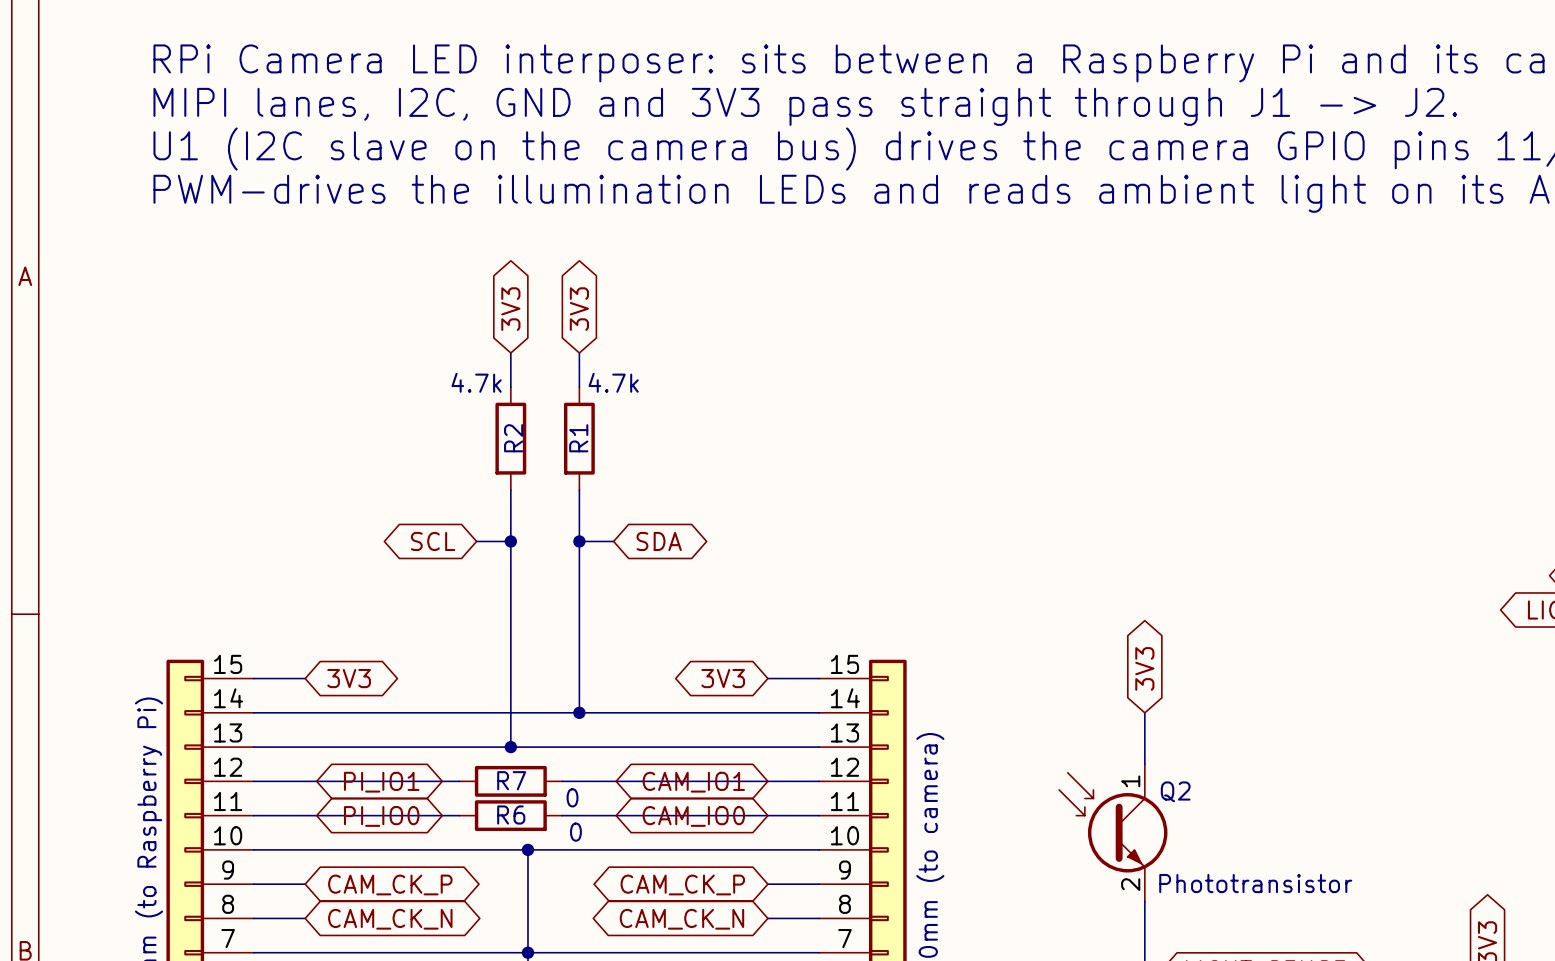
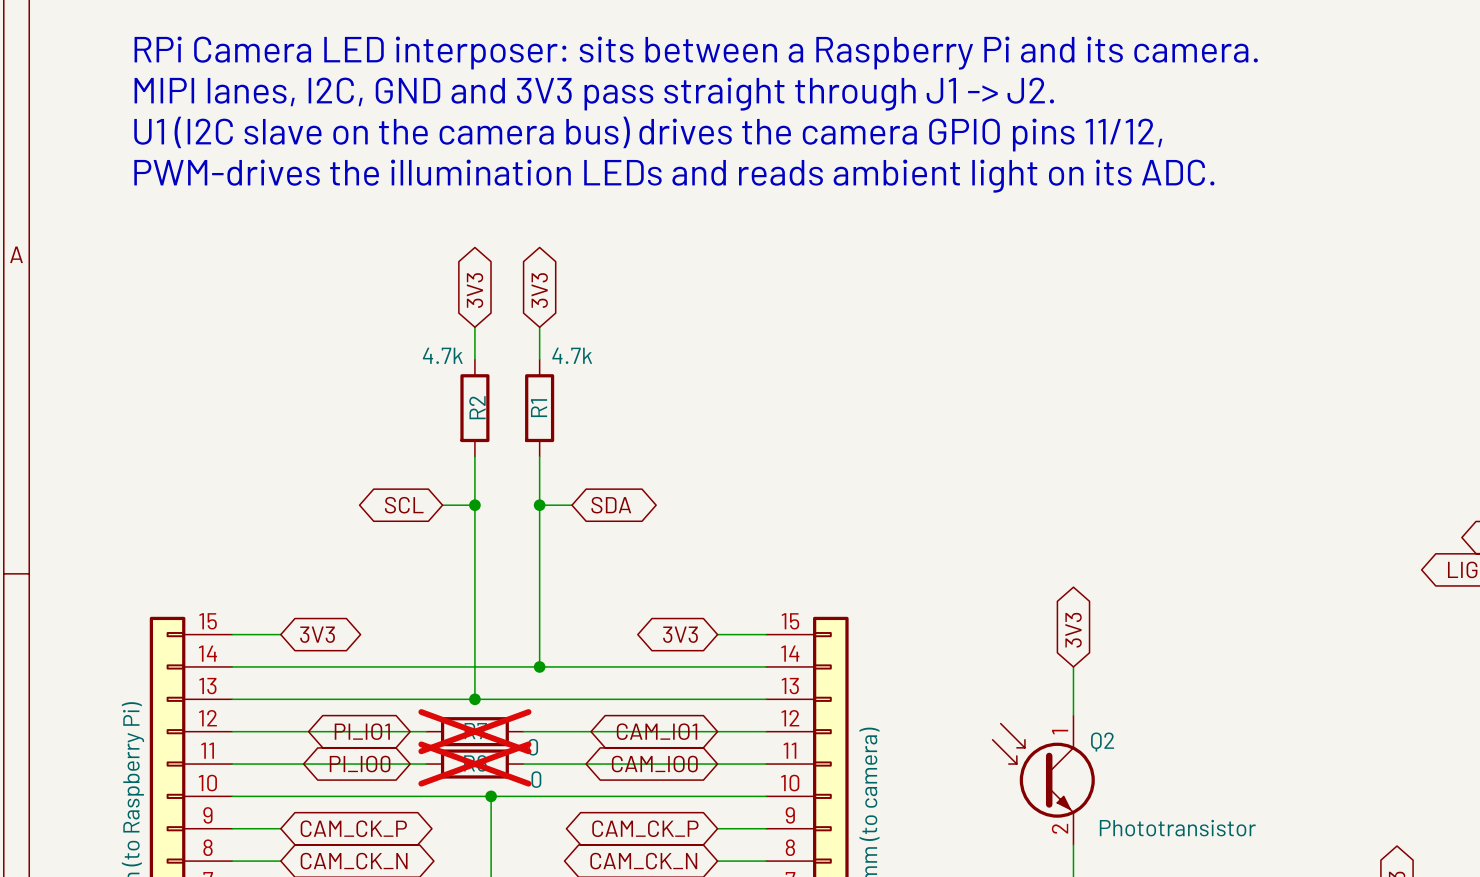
R7 do-not-place cross: none -> (474, 731)
R6 do-not-place cross: none -> (474, 764)

